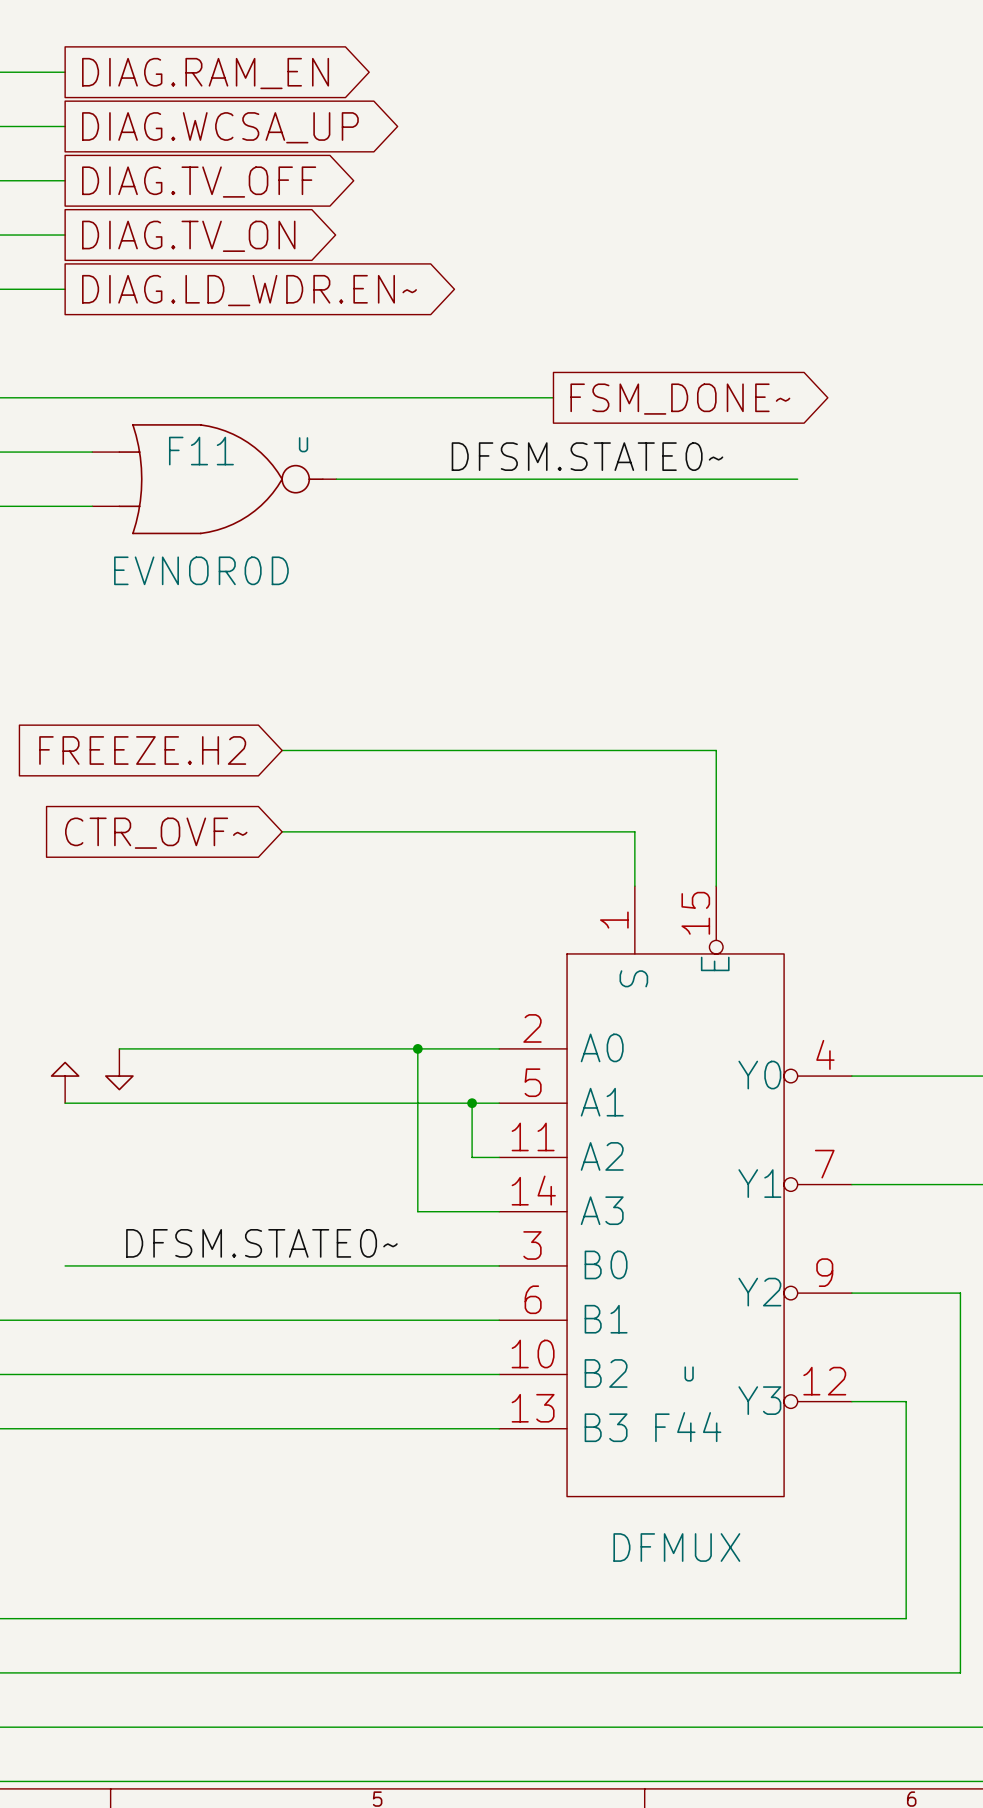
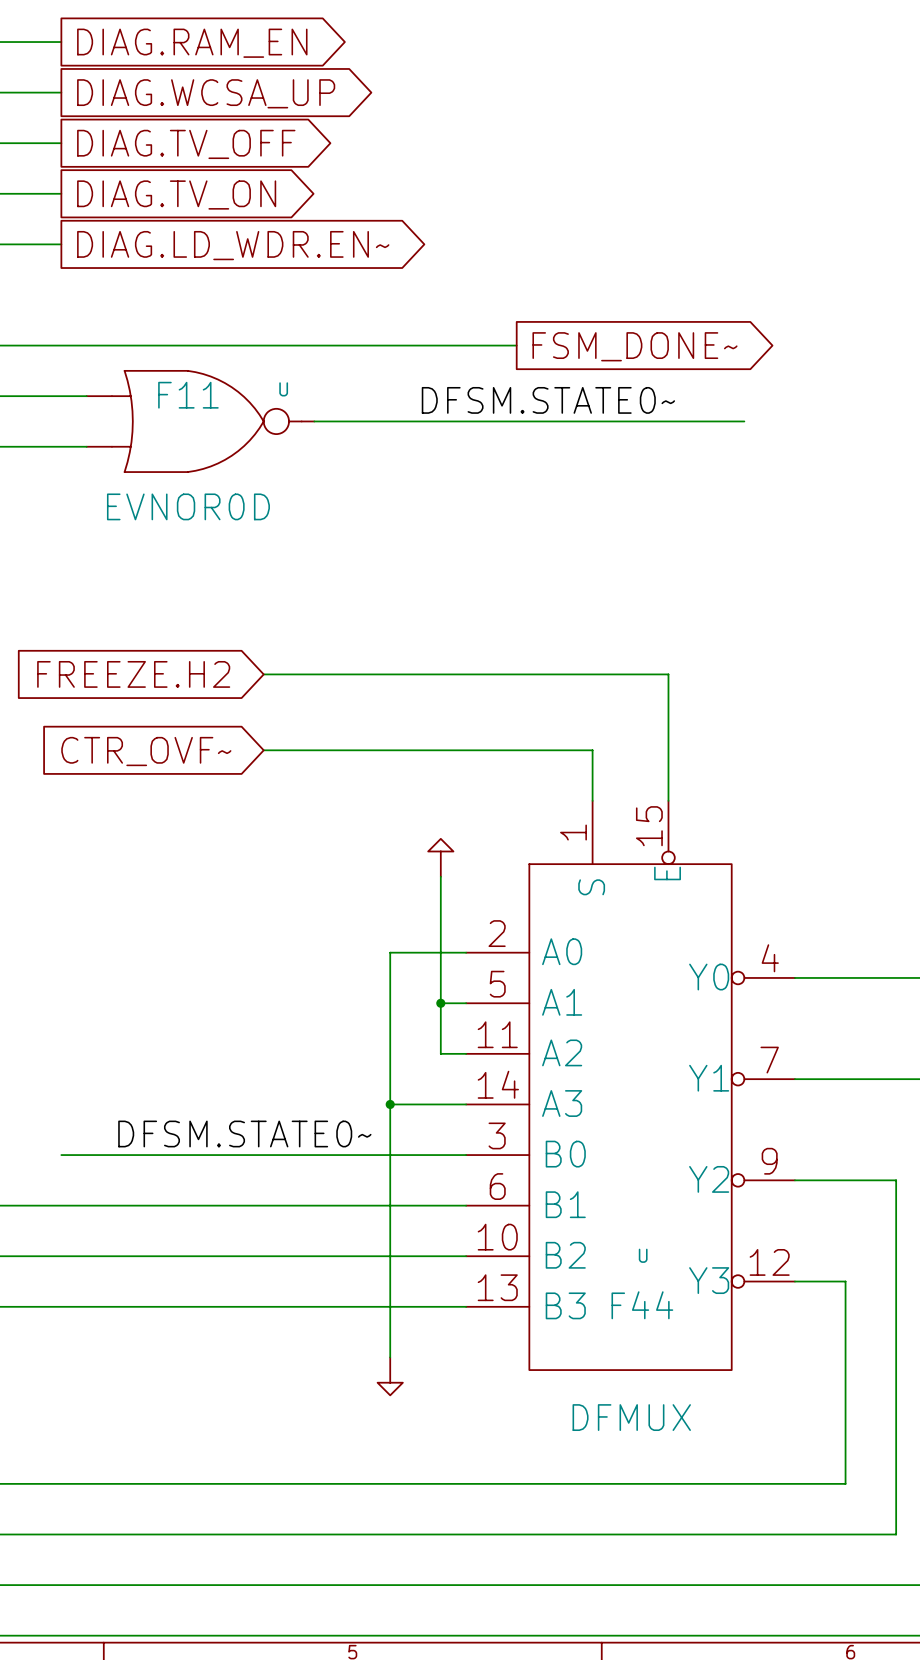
power symbol: none -> (440, 857)
wire: (119, 1048) (417, 1048) -> none
junction: (417, 1048) -> none
power symbol: (119, 1069) -> none
power symbol: (65, 1082) -> none
wire: (65, 1103) (472, 1103) -> (440, 876) (440, 1003)
wire: none -> (390, 1104) (390, 1357)
junction: none -> (390, 1104)
power symbol: none -> (390, 1376)

